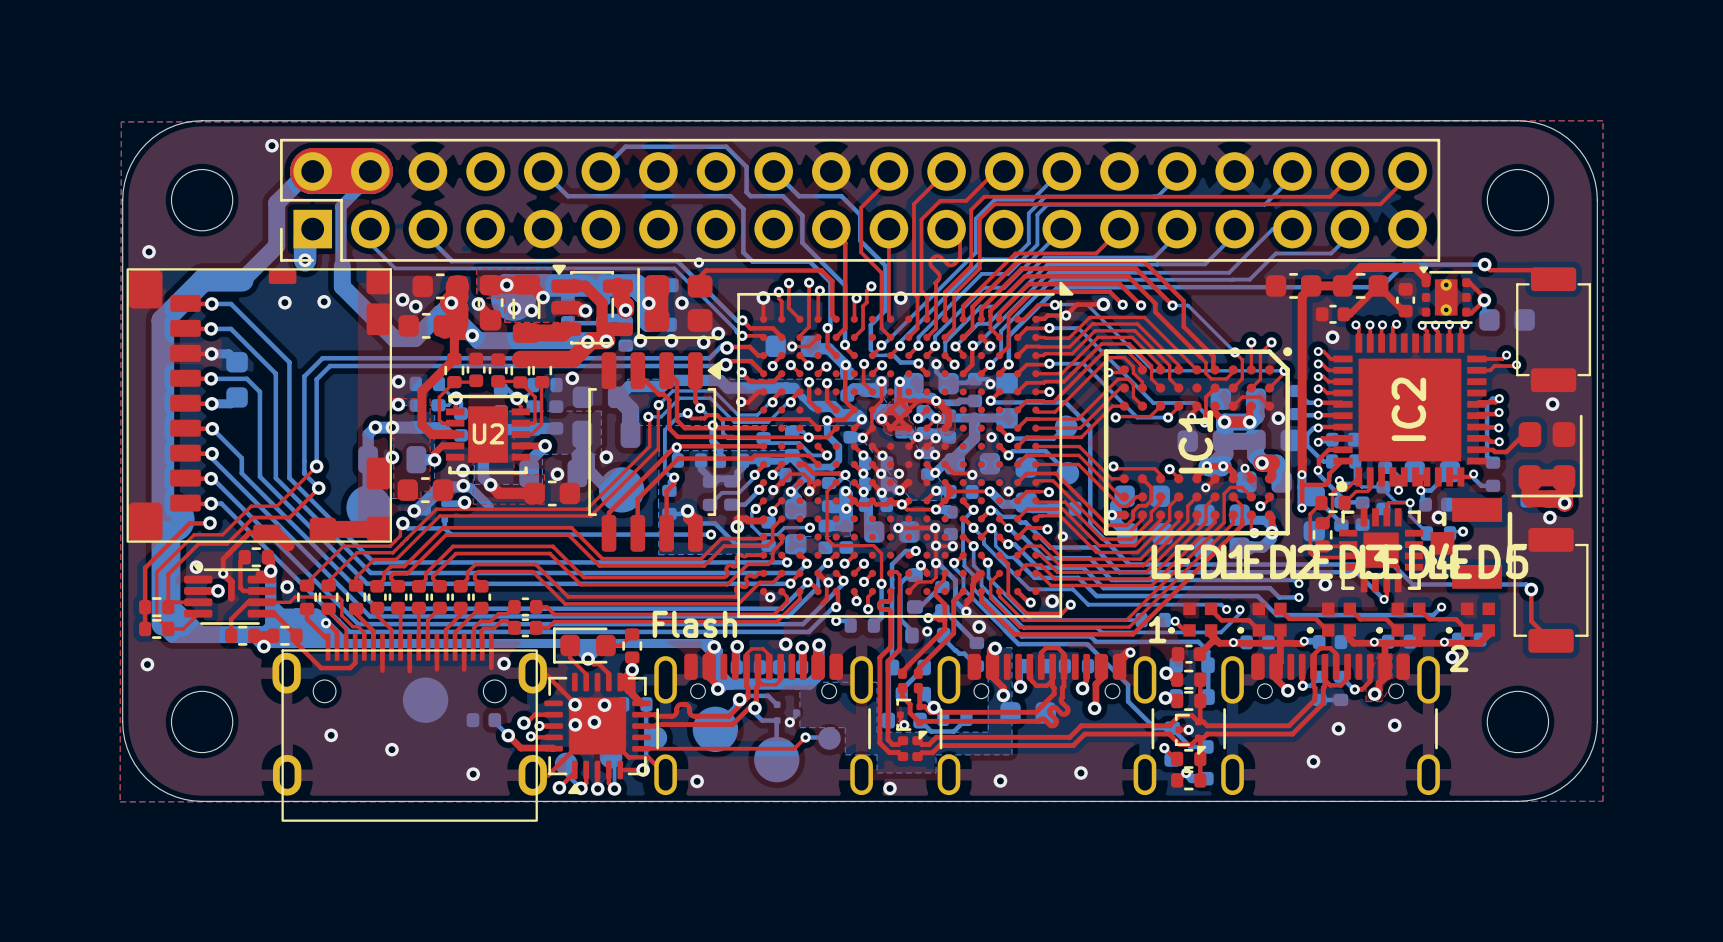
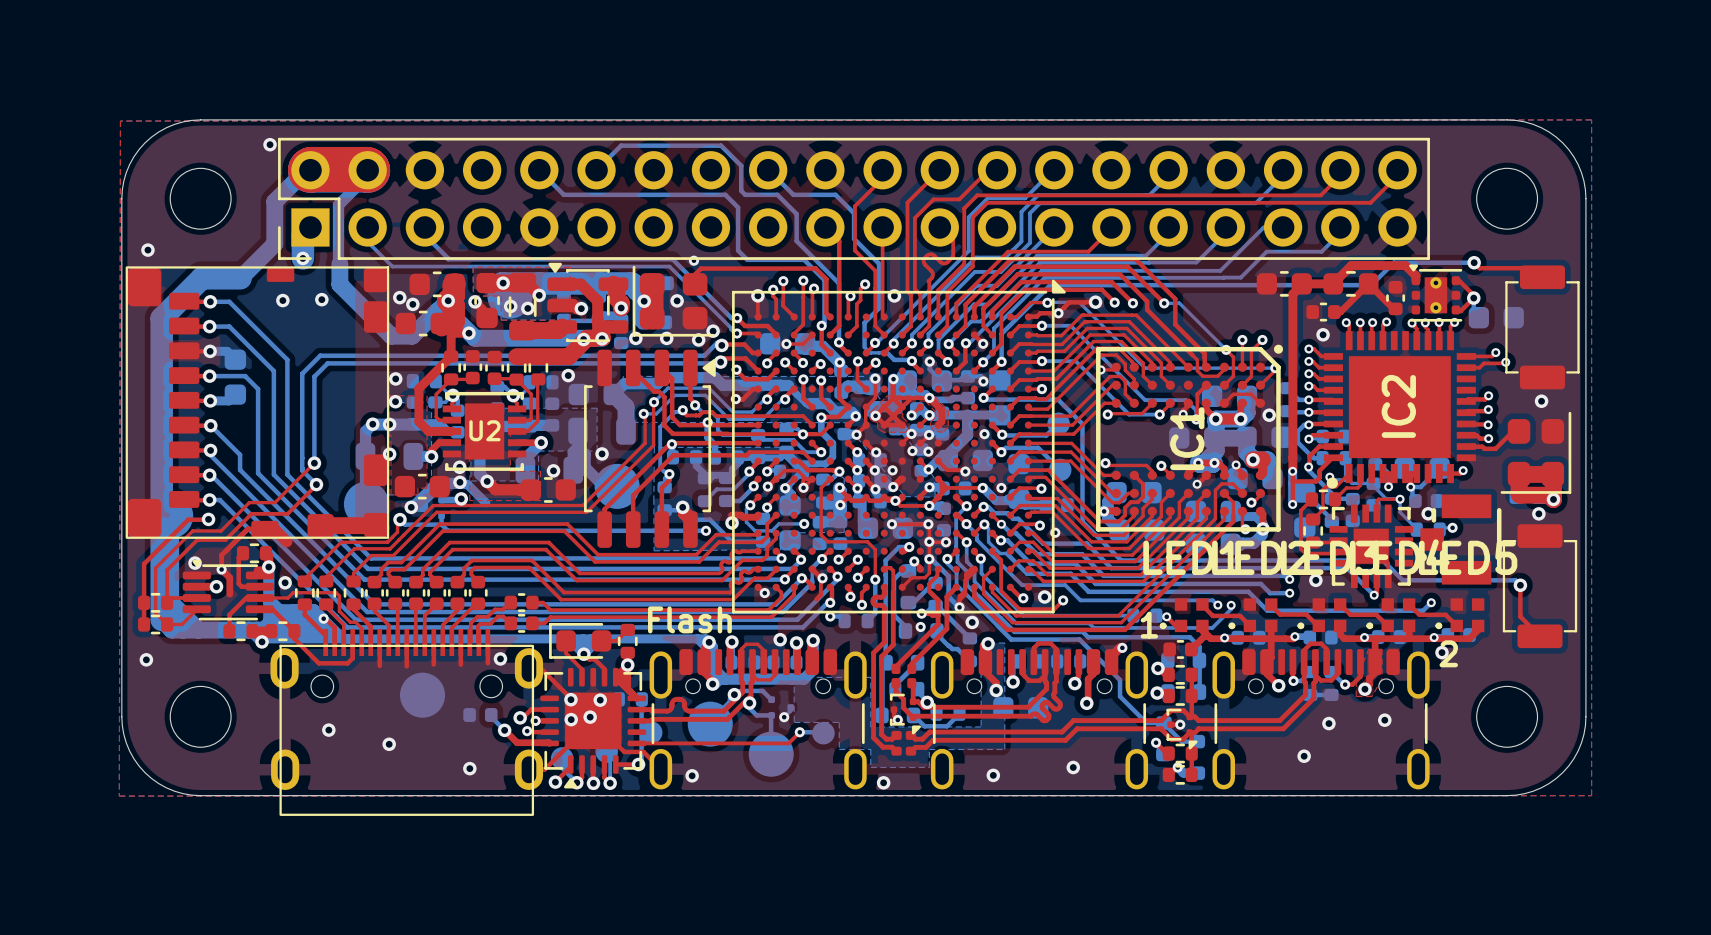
bottom track: (1499, 398) (1492, 398) (1487, 404) (1487, 456) (1492, 462) -> none
bottom track: (1473, 474) (1473, 478) (1481, 485) (1492, 485) -> none
part: (1492, 474) -> none

